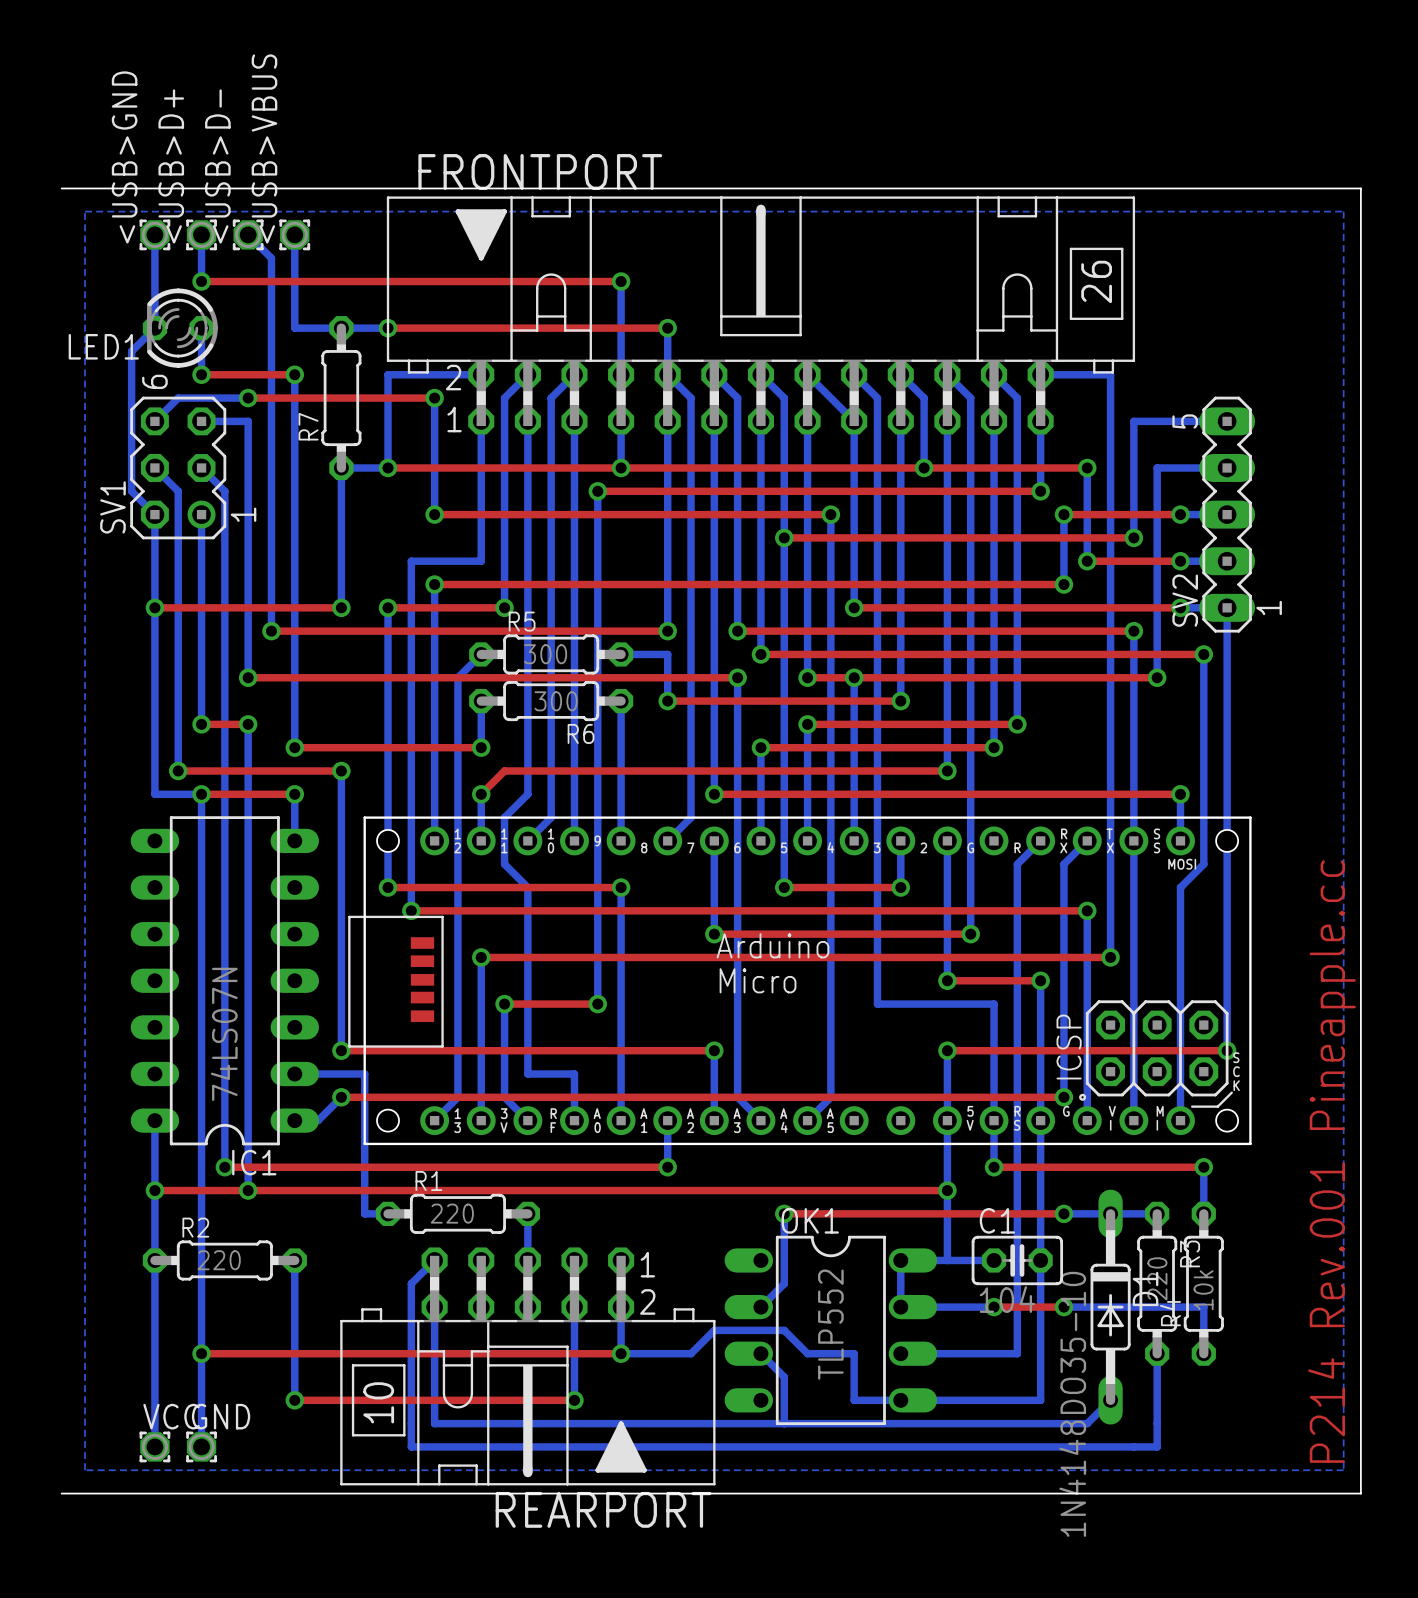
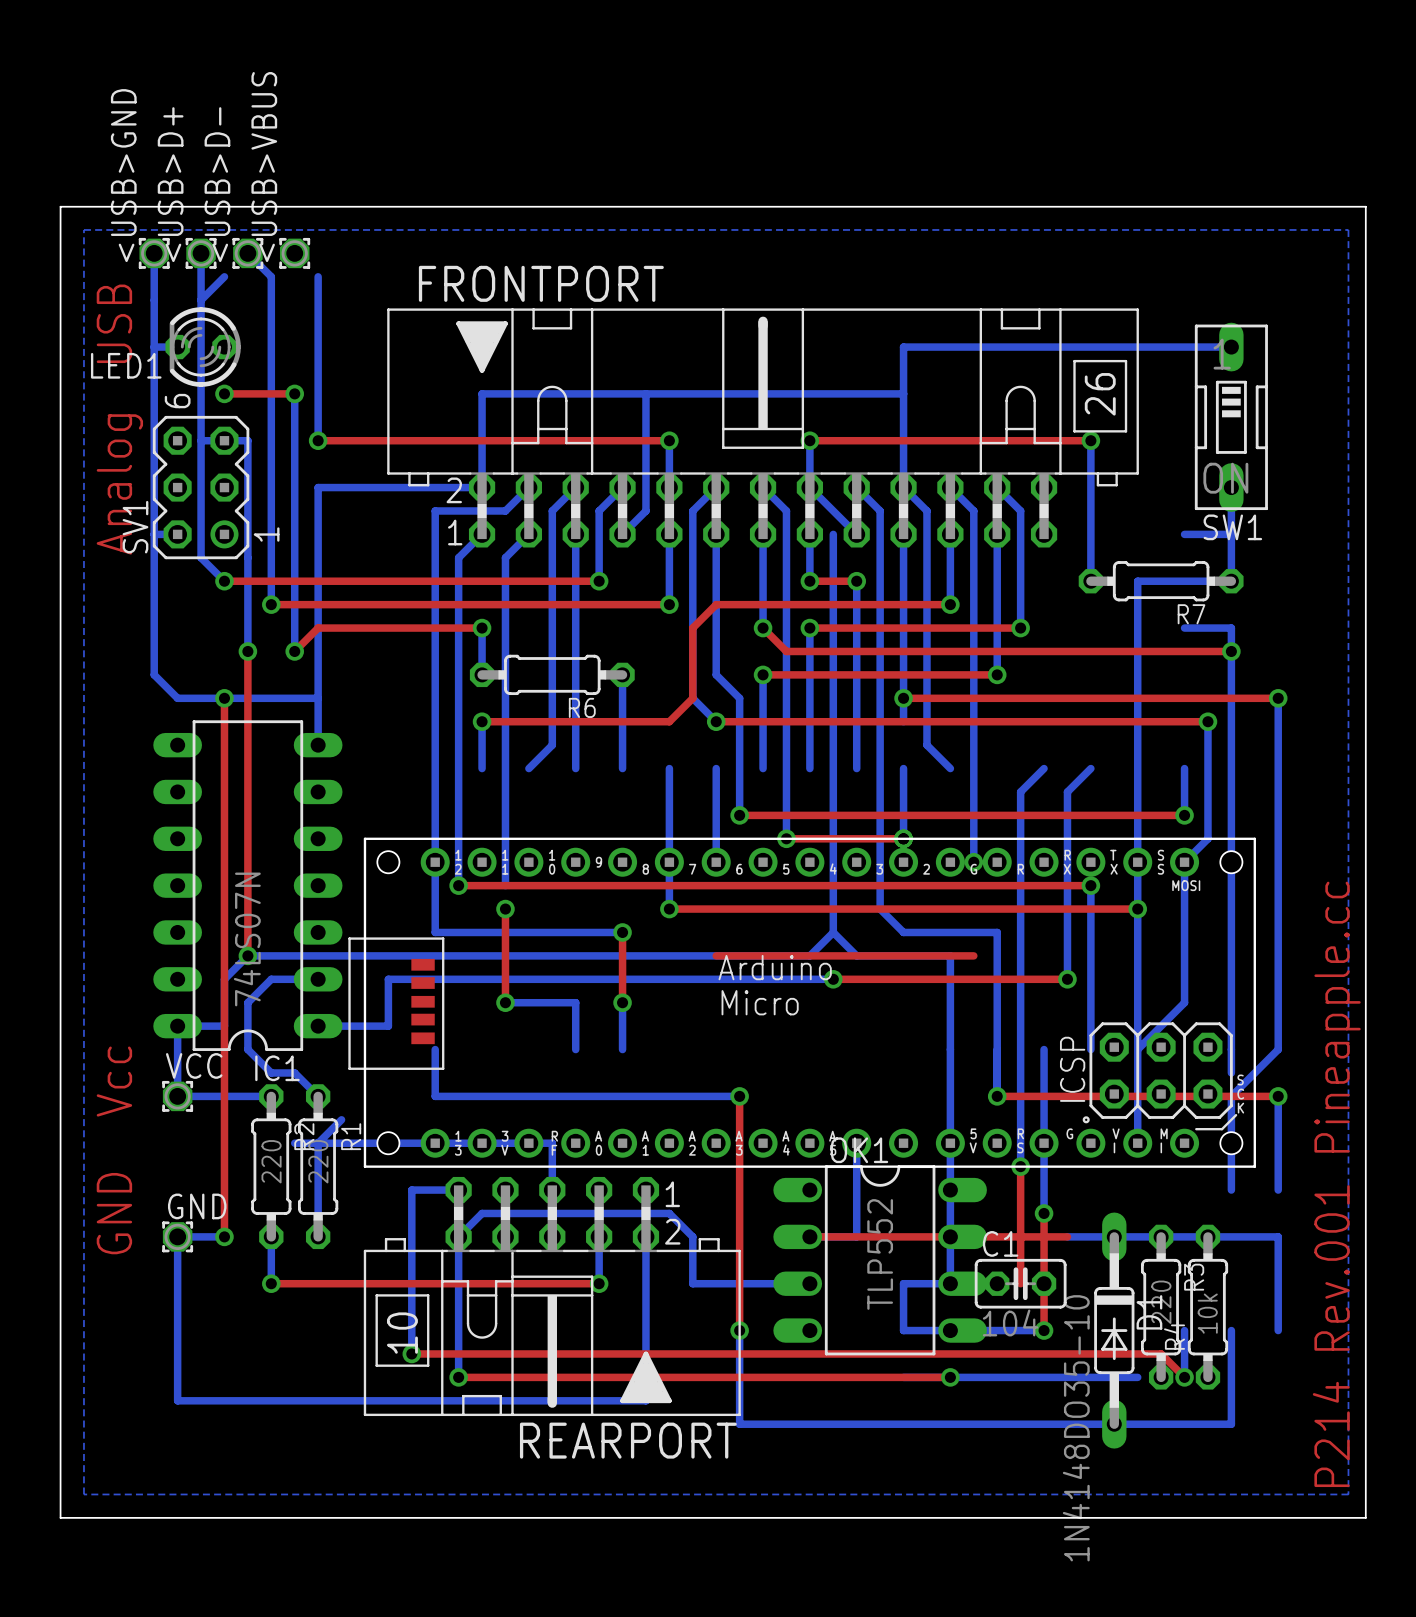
board edge: none -> (60, 206) (60, 1517)
bottom track: (294, 234) (294, 328) (388, 328) -> none
bottom track: none -> (224, 276) (201, 300) (201, 347)
bottom track: none -> (318, 276) (318, 440)
top track: (201, 281) (621, 281) -> none
via: (201, 281) -> none
bottom track: (621, 281) (621, 374) -> none
via: (621, 281) -> none
text: none -> USB (114, 323)
FRONTPORT position: (760, 315) -> (763, 427)
bottom track: (154, 328) (131, 351) (131, 491) (154, 514) -> none
bottom track: none -> (177, 347) (154, 347) (154, 534) (177, 534)
LED1 position: (180, 328) -> (203, 347)
top track: (388, 328) (667, 328) -> (809, 440) (1090, 440)
via: (388, 328) -> none
bottom track: (667, 328) (667, 374) (691, 398) (691, 491) -> (716, 487) (692, 510)
via: (667, 328) -> none
bottom track: none -> (1231, 347) (903, 347) (903, 440)
bottom track: none -> (201, 393) (201, 534)
top track: (201, 374) (224, 374) -> none
via: (201, 374) -> none
via: none -> (224, 393)
bottom track: (481, 374) (388, 374) (388, 467) -> (482, 487) (388, 487)
bottom track: (527, 374) (504, 398) (504, 537) -> (528, 534) (505, 557)
bottom track: (574, 374) (551, 398) (551, 491) -> (575, 487) (552, 510)
bottom track: none -> (645, 393) (645, 510) (622, 534)
bottom track: (714, 374) (737, 398) (737, 631) -> none
bottom track: (760, 374) (784, 398) (784, 491) -> (763, 487) (786, 510)
bottom track: (807, 374) (854, 421) (854, 561) -> none
bottom track: (854, 374) (877, 398) (877, 491) -> (856, 487) (880, 510)
bottom track: (900, 374) (924, 398) (924, 467) -> (903, 393) (482, 393) (482, 440)
bottom track: (947, 374) (970, 398) (970, 491) -> (950, 487) (973, 510)
bottom track: (994, 374) (1017, 398) (1017, 491) -> (997, 487) (1020, 510)
bottom track: (1040, 374) (1110, 374) (1110, 957) -> none
bottom track: (248, 398) (178, 398) (154, 421) -> none
top track: (248, 398) (434, 398) -> none
via: (248, 398) -> none
R7 rotation: 0° (341, 398) -> 90° clockwise (1161, 581)
R7 position: (341, 398) -> (1161, 581)
bottom track: (434, 398) (434, 491) -> (528, 487) (505, 510) (435, 510)
via: (434, 398) -> none
SW1: none -> (1231, 417)
top track: none -> (318, 440) (669, 440)
via: none -> (318, 440)
bottom track: (527, 421) (527, 794) (504, 817) -> (505, 628) (505, 838)
bottom track: (574, 421) (574, 514) -> none
bottom track: (621, 421) (621, 467) -> (599, 510) (622, 487)
via: none -> (669, 440)
bottom track: (714, 421) (714, 514) -> none
bottom track: (760, 421) (760, 514) -> none
via: none -> (809, 440)
bottom track: (947, 421) (947, 514) -> none
bottom track: (994, 421) (994, 514) -> none
bottom track: (1040, 421) (1040, 491) -> (856, 628) (856, 698)
via: none -> (1090, 440)
bottom track: (1227, 421) (1133, 421) (1133, 537) -> none
R7 name position: R7 (308, 426) -> R7 (1191, 614)
text: none -> Analog (119, 484)
bottom track: (154, 467) (178, 491) (178, 771) -> none
SV1 position: (178, 467) -> (201, 487)
bottom track: (201, 467) (224, 491) (224, 957) -> none
bottom track: (341, 467) (341, 607) -> (341, 487) (318, 487) (318, 745)
top track: (388, 467) (1087, 467) -> none
via: (388, 467) -> none
bottom track: (481, 467) (481, 561) (411, 561) (411, 910) -> none
via: (621, 467) -> none
bottom track: (667, 467) (667, 514) -> none
bottom track: (807, 467) (807, 514) -> (809, 487) (856, 534)
bottom track: (900, 467) (900, 514) -> (903, 487) (926, 510) (926, 745) (950, 768)
via: (924, 467) -> none
via: (1087, 467) -> none
bottom track: (1227, 467) (1157, 467) (1157, 677) -> (1231, 487) (1231, 581)
top track: (597, 491) (1040, 491) -> none
via: (597, 491) -> none
via: (1040, 491) -> none
bottom track: none -> (435, 534) (435, 604)
top track: (434, 514) (830, 514) -> none
via: (434, 514) -> none
bottom track: none -> (482, 534) (458, 557) (458, 698)
via: (830, 514) -> none
bottom track: (1063, 514) (1063, 584) -> none
top track: (1063, 514) (1180, 514) -> (786, 838) (903, 838)
via: (1063, 514) -> none
via: (1180, 514) -> none
SV2: (1227, 514) -> none
bottom track: (201, 537) (201, 724) -> (201, 557) (224, 581)
top track: (784, 537) (1133, 537) -> none
via: (784, 537) -> none
via: (1133, 537) -> none
top track: none -> (224, 581) (599, 581)
via: none -> (224, 581)
bottom track: (597, 561) (597, 1004) -> none
via: none -> (599, 581)
bottom track: (807, 561) (807, 607) -> (809, 698) (809, 745)
top track: none -> (809, 581) (856, 581)
via: none -> (809, 581)
via: none -> (856, 581)
top track: (1087, 561) (1180, 561) -> (1137, 651) (1231, 651)
via: (1087, 561) -> none
bottom track: none -> (1184, 581) (1137, 581) (1137, 651)
via: (1180, 561) -> none
bottom track: (271, 584) (271, 631) -> none
via: none -> (271, 604)
via: (434, 584) -> none
bottom track: (667, 584) (667, 631) -> none
top track: (667, 584) (714, 584) -> (482, 721) (669, 721) (692, 698) (692, 628) (716, 604)
via: none -> (669, 604)
bottom track: (947, 584) (947, 771) -> none
top track: (947, 584) (1063, 584) -> (669, 909) (786, 909)
via: none -> (950, 604)
via: (1063, 584) -> none
top track: (154, 607) (318, 607) -> (294, 651) (318, 628)
via: (154, 607) -> none
via: (341, 607) -> none
bottom track: (388, 607) (388, 887) -> none
via: (388, 607) -> none
top track: (481, 607) (504, 607) -> none
via position: (504, 607) -> (482, 628)
bottom track: (760, 607) (760, 654) -> (763, 768) (763, 674)
via: none -> (809, 628)
via: (854, 607) -> none
bottom track: (1017, 607) (1017, 724) -> none
top track: (1017, 607) (1180, 607) -> none
via: none -> (1020, 628)
via: (1180, 607) -> none
R5 name: R5 (522, 621) -> R6 (582, 707)
bottom track: (248, 631) (248, 677) -> none
top track: none -> (247, 651) (247, 955)
via: none -> (247, 651)
top track: (271, 631) (667, 631) -> none
via: (271, 631) -> none
bottom track: (294, 631) (294, 747) -> none
via: none -> (294, 651)
via: (667, 631) -> none
top track: (737, 631) (784, 631) -> (763, 628) (786, 651)
via position: (737, 631) -> (763, 628)
via: (1133, 631) -> none
via: none -> (1231, 651)
bottom track: (154, 654) (154, 794) (201, 794) (201, 1446) -> (154, 674) (177, 698) (318, 698)
bottom track: (481, 654) (457, 677) -> (482, 674) (482, 628)
R5 value: 300 (545, 654) -> none
bottom track: (621, 654) (667, 654) (667, 701) -> (622, 674) (622, 721)
bottom track: (714, 654) (714, 747) -> (716, 674) (739, 698)
bottom track: (994, 654) (994, 747) -> none
top track: (994, 654) (1203, 654) -> none
via: none -> (997, 674)
bottom track: (1203, 654) (1203, 701) -> (1090, 440) (1090, 487)
via: (1203, 654) -> none
top track: none -> (224, 698) (224, 1236)
via: none -> (224, 698)
top track: (248, 677) (737, 677) -> none
via: (248, 677) -> none
bottom track: (691, 677) (691, 817) (667, 840) -> (692, 698) (716, 721)
via: (737, 677) -> none
top track: (807, 677) (900, 677) -> none
via: (807, 677) -> none
via: (854, 677) -> none
via: none -> (903, 698)
top track: none -> (1161, 698) (1278, 698)
via: (1157, 677) -> none
bottom track: none -> (1278, 698) (1278, 1049) (1231, 1096) (1231, 1190)
via: none -> (1278, 698)
via: none -> (482, 721)
R6: 300 (551, 701) -> none
top track: (667, 701) (714, 701) -> (809, 628) (856, 628)
via: (667, 701) -> none
via: none -> (716, 721)
top track: none -> (903, 721) (1207, 721)
via: (900, 701) -> none
via: none -> (1207, 721)
top track: (201, 724) (248, 724) -> (341, 628) (388, 628)
via: (201, 724) -> none
bottom track: (248, 724) (248, 980) -> (318, 979) (271, 979) (247, 1002)
via: (248, 724) -> none
bottom track: (551, 724) (551, 817) (527, 840) -> (552, 745) (528, 768)
top track: (807, 724) (1017, 724) -> none
via: (807, 724) -> none
via: (1017, 724) -> none
top track: (294, 747) (481, 747) -> none
via: (294, 747) -> none
via: (481, 747) -> none
bottom track: (574, 747) (574, 840) -> none
bottom track: (621, 747) (621, 840) -> none
bottom track: (760, 747) (760, 840) -> none
top track: (760, 747) (994, 747) -> (903, 909) (1137, 909)
via: (760, 747) -> none
bottom track: (807, 747) (807, 840) -> none
bottom track: (854, 747) (854, 840) -> none
via: (994, 747) -> none
top track: (178, 771) (341, 771) -> (271, 604) (435, 604)
via: (178, 771) -> none
bottom track: (341, 771) (341, 1050) -> none
via: (341, 771) -> none
top track: (947, 771) (504, 771) (481, 794) -> none
via: (947, 771) -> none
top track: (201, 794) (294, 794) -> none
via: (201, 794) -> none
bottom track: (294, 794) (294, 840) -> none
via: (294, 794) -> none
bottom track: (481, 794) (481, 840) -> none
via: (481, 794) -> none
top track: (714, 794) (737, 794) -> none
via: (714, 794) -> none
bottom track: (737, 794) (737, 1097) (760, 1120) -> none
via: none -> (739, 815)
bottom track: (1180, 794) (1180, 840) -> (1184, 815) (1184, 768)
bottom track: (784, 817) (784, 887) -> (903, 768) (903, 838)
via: none -> (786, 838)
via: none -> (903, 838)
bottom track: (1203, 817) (1203, 864) (1180, 887) -> (1207, 838) (1184, 862) (1184, 909)
bottom track: none -> (435, 862) (435, 932) (622, 932)
bottom track: (714, 840) (714, 934) -> (716, 862) (716, 815)
bottom track: (900, 840) (900, 887) -> none
bottom track: (947, 840) (947, 934) -> (224, 979) (247, 955) (809, 955) (833, 932) (856, 955) (950, 955)
bottom track: (970, 840) (970, 934) -> none
via: none -> (973, 862)
bottom track: (1040, 840) (1017, 864) -> (1044, 768) (1020, 791) (1020, 885)
bottom track: (1087, 840) (1063, 864) -> (1090, 768) (1067, 791) (1067, 885)
bottom track: (457, 864) (457, 1097) (434, 1120) -> none
top track: none -> (458, 885) (1090, 885)
via: none -> (458, 885)
bottom track: (504, 864) (527, 887) (527, 1074) -> (435, 1049) (435, 1096) (528, 1096)
via: none -> (1090, 885)
top track: (388, 887) (621, 887) -> none
via: (388, 887) -> none
top track: none -> (505, 909) (505, 1002)
via: none -> (505, 909)
bottom track: (621, 887) (621, 980) -> none
via: (621, 887) -> none
via: none -> (669, 909)
via: (784, 887) -> none
bottom track: (877, 887) (877, 1004) (994, 1004) -> (880, 909) (903, 932) (997, 932) (997, 1026)
via: (900, 887) -> none
via: none -> (1137, 909)
top track: (411, 910) (1087, 910) -> none
via: (411, 910) -> none
top track: none -> (622, 932) (622, 1002)
via: none -> (622, 932)
bottom track: (830, 910) (830, 1097) (807, 1120) -> none
via: (1087, 910) -> none
via: none -> (247, 955)
via: (714, 934) -> none
via: (970, 934) -> none
bottom track: (481, 957) (481, 1120) -> none
top track: (481, 957) (830, 957) -> none
via: (481, 957) -> none
bottom track: none -> (833, 979) (388, 979) (388, 1026) (318, 1026)
via: none -> (833, 979)
bottom track: (1063, 957) (1063, 1097) -> (669, 768) (669, 909)
top track: (1063, 957) (1110, 957) -> none
via: none -> (1067, 979)
via: (1110, 957) -> none
IC1 position: (224, 980) -> (247, 885)
bottom track: none -> (505, 1002) (575, 1002) (575, 1049)
via: none -> (505, 1002)
top track: (947, 980) (1040, 980) -> none
via: (947, 980) -> none
bottom track: (1040, 980) (1040, 1027) -> (1090, 885) (1090, 932)
via: (1040, 980) -> none
bottom track: (1180, 980) (1180, 1120) -> (1184, 1002) (1137, 1049)
bottom track: (224, 1004) (224, 1167) -> (224, 1026) (177, 1026) (177, 1096) (271, 1096)
bottom track: (504, 1004) (504, 1097) (527, 1120) -> none
top track: (504, 1004) (597, 1004) -> none
via: (504, 1004) -> none
via position: (597, 1004) -> (622, 1002)
bottom track: (248, 1027) (248, 1190) -> (247, 1049) (271, 1072) (294, 1072) (318, 1096)
bottom track: (621, 1027) (621, 1120) -> none
bottom track: (1087, 1027) (1087, 1120) -> (1278, 1096) (1278, 1190)
top track: (341, 1050) (714, 1050) -> none
via: (341, 1050) -> none
bottom track: (714, 1050) (714, 1120) -> (950, 1002) (950, 1072)
via position: (714, 1050) -> (739, 1096)
top track: (947, 1050) (1227, 1050) -> (997, 1096) (1278, 1096)
via: (947, 1050) -> none
via position: (1227, 1050) -> (1278, 1096)
text: none -> Vcc (114, 1081)
bottom track: (294, 1074) (364, 1074) (364, 1213) (388, 1213) -> none
bottom track: (574, 1074) (574, 1120) -> (575, 1096) (739, 1096)
top track: none -> (739, 1096) (739, 1330)
bottom track: (994, 1074) (994, 1167) -> none
via: none -> (997, 1096)
top track: (341, 1097) (1063, 1097) -> none
via: (341, 1097) -> none
via: (1063, 1097) -> none
bottom track: (154, 1120) (154, 1446) -> none
bottom track: (667, 1120) (667, 1167) -> (271, 1236) (271, 1283)
bottom track: none -> (856, 1143) (856, 1236) (809, 1236)
bottom track: (1017, 1143) (1017, 1353) -> (1137, 1377) (1020, 1377)
top track: none -> (1020, 1166) (1020, 1283)
via: none -> (1020, 1166)
top track: (224, 1167) (667, 1167) -> none
via: (224, 1167) -> none
bottom track: none -> (552, 1190) (552, 1143) (318, 1143) (318, 1236)
via: (667, 1167) -> none
top track: (994, 1167) (1203, 1167) -> none
via: (994, 1167) -> none
bottom track: (1203, 1167) (1203, 1213) -> (1184, 1330) (1184, 1377)
via: (1203, 1167) -> none
text: none -> GND (114, 1213)
top track: (154, 1190) (947, 1190) -> none
via: (154, 1190) -> none
via: (248, 1190) -> none
via: (947, 1190) -> none
bottom track: (1040, 1190) (1040, 1400) -> (1231, 1330) (1231, 1424) (1044, 1424)
top track: none -> (1044, 1213) (1044, 1330)
via: none -> (1044, 1213)
bottom track: none -> (224, 1236) (177, 1236) (177, 1400) (645, 1400) (645, 1236)
via: none -> (224, 1236)
R1 rotation: 0° (457, 1213) -> 90° clockwise (318, 1166)
R1 position: (457, 1213) -> (318, 1166)
bottom track: (527, 1213) (527, 1260) -> (599, 1236) (599, 1283)
bottom track: (784, 1213) (784, 1283) (760, 1307) -> none
via: (784, 1213) -> none
via: (1063, 1213) -> none
bottom track: none -> (1161, 1236) (1278, 1236) (1278, 1330)
R2 rotation: 0° (224, 1260) -> 90° clockwise (271, 1166)
R2 position: (224, 1260) -> (271, 1166)
top track: none -> (271, 1283) (599, 1283)
via: none -> (271, 1283)
bottom track: (294, 1260) (294, 1400) -> none
bottom track: (434, 1260) (411, 1283) -> (458, 1190) (411, 1190) (411, 1307)
via: none -> (599, 1283)
bottom track: none -> (809, 1283) (692, 1283) (692, 1236) (669, 1213) (482, 1213) (458, 1236) (458, 1377)
bottom track: (434, 1307) (434, 1423) (1087, 1423) (1110, 1400) -> none
bottom track: (574, 1307) (574, 1400) -> none
bottom track: (621, 1307) (621, 1353) (691, 1353) (714, 1330) (784, 1330) (807, 1353) (854, 1353) (854, 1400) -> (739, 1330) (739, 1424) (856, 1424)
via: none -> (739, 1330)
bottom track: none -> (997, 1330) (1044, 1330)
top track: (994, 1307) (1063, 1307) -> none
via: (994, 1307) -> none
via: none -> (1044, 1330)
bottom track: (1063, 1307) (1203, 1307) (1203, 1353) -> none
via: (1063, 1307) -> none
bottom track: (411, 1330) (411, 1446) (1157, 1446) (1157, 1353) -> none
top track: none -> (411, 1353) (1161, 1353) (1184, 1377)
via: none -> (411, 1353)
OK1 position: (830, 1330) -> (880, 1260)
top track: (201, 1353) (457, 1353) -> none
via: (201, 1353) -> none
via: none -> (458, 1377)
top track: none -> (622, 1377) (950, 1377)
via: (621, 1353) -> none
bottom track: (760, 1353) (784, 1377) (784, 1423) -> none
via: none -> (950, 1377)
via: none -> (1184, 1377)
REARPORT position: (527, 1366) -> (552, 1296)
top track: (294, 1400) (574, 1400) -> none
via: (294, 1400) -> none
via: (574, 1400) -> none
VCC position: (154, 1446) -> (177, 1096)
GND position: (201, 1446) -> (177, 1236)

